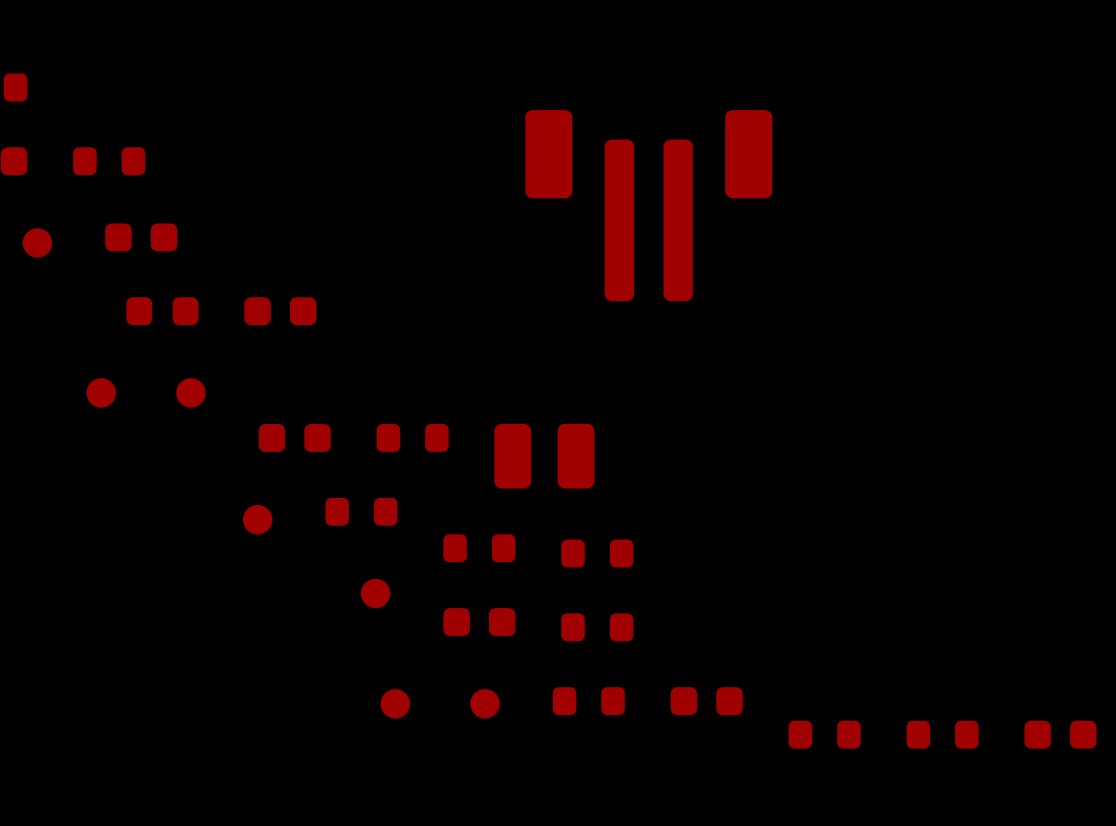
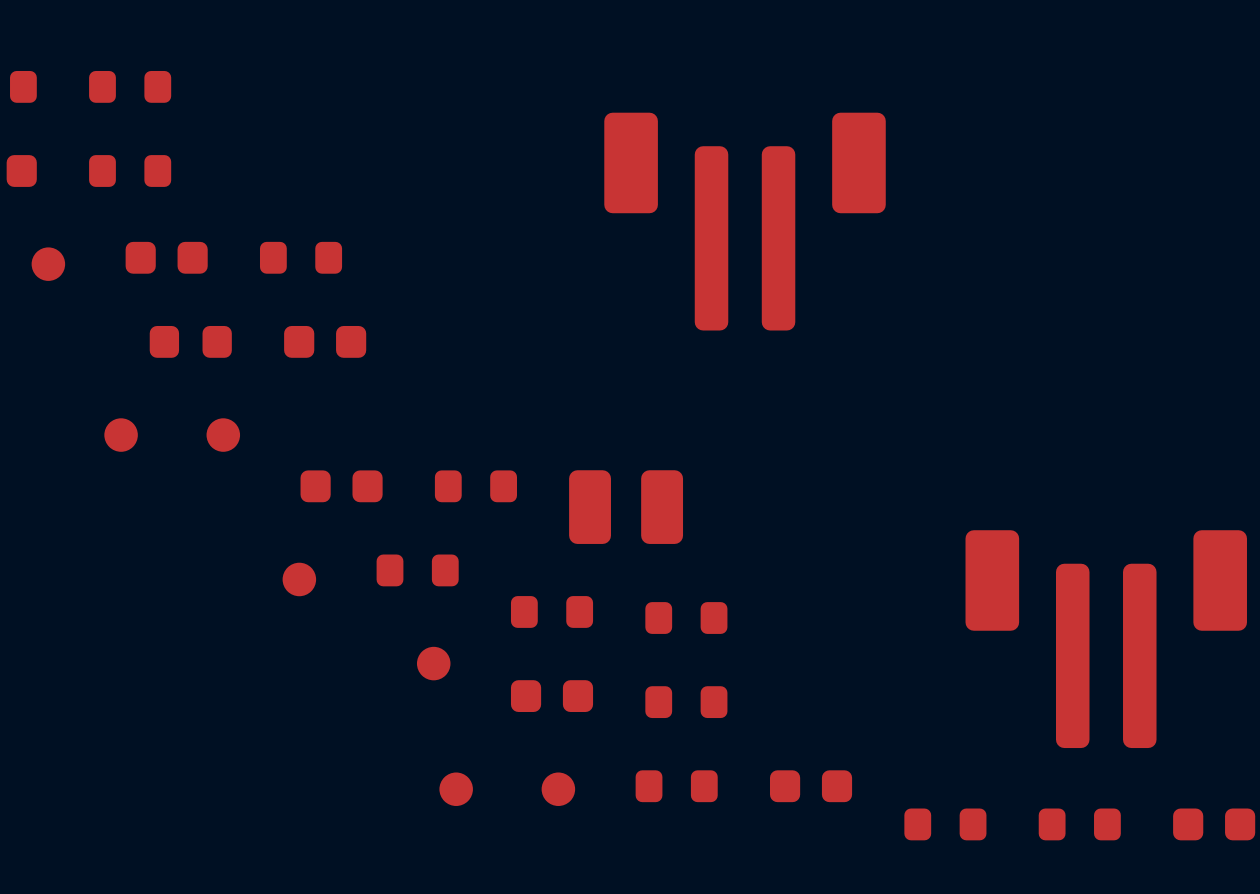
part: none -> (130, 86)
part: none -> (301, 257)
part: none -> (1106, 639)

